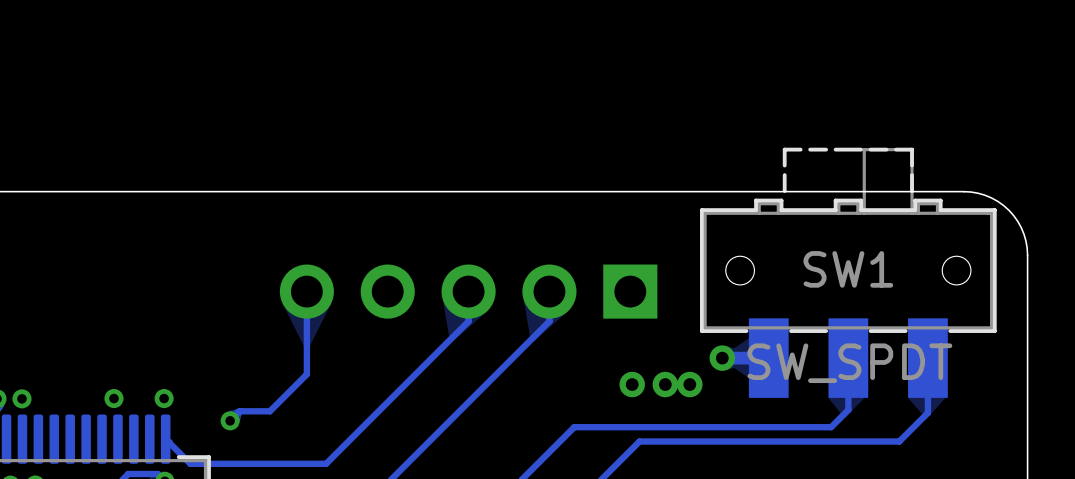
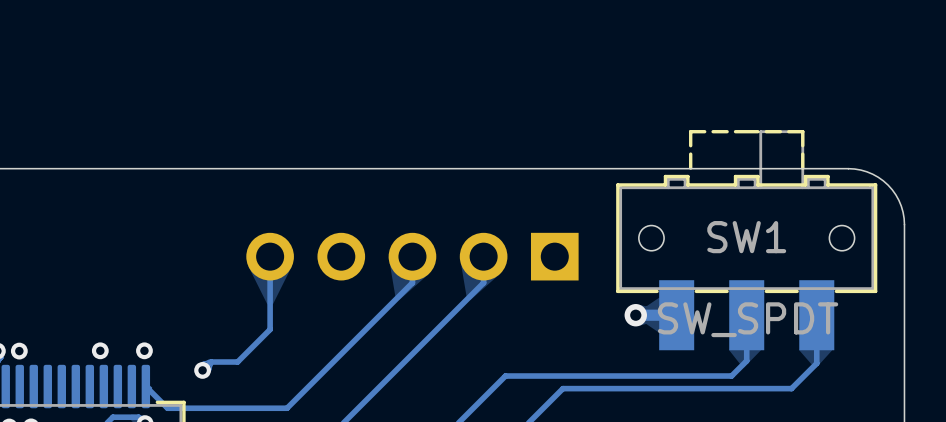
via: (632, 384) -> none
via: (665, 384) -> none
via: (689, 384) -> none

